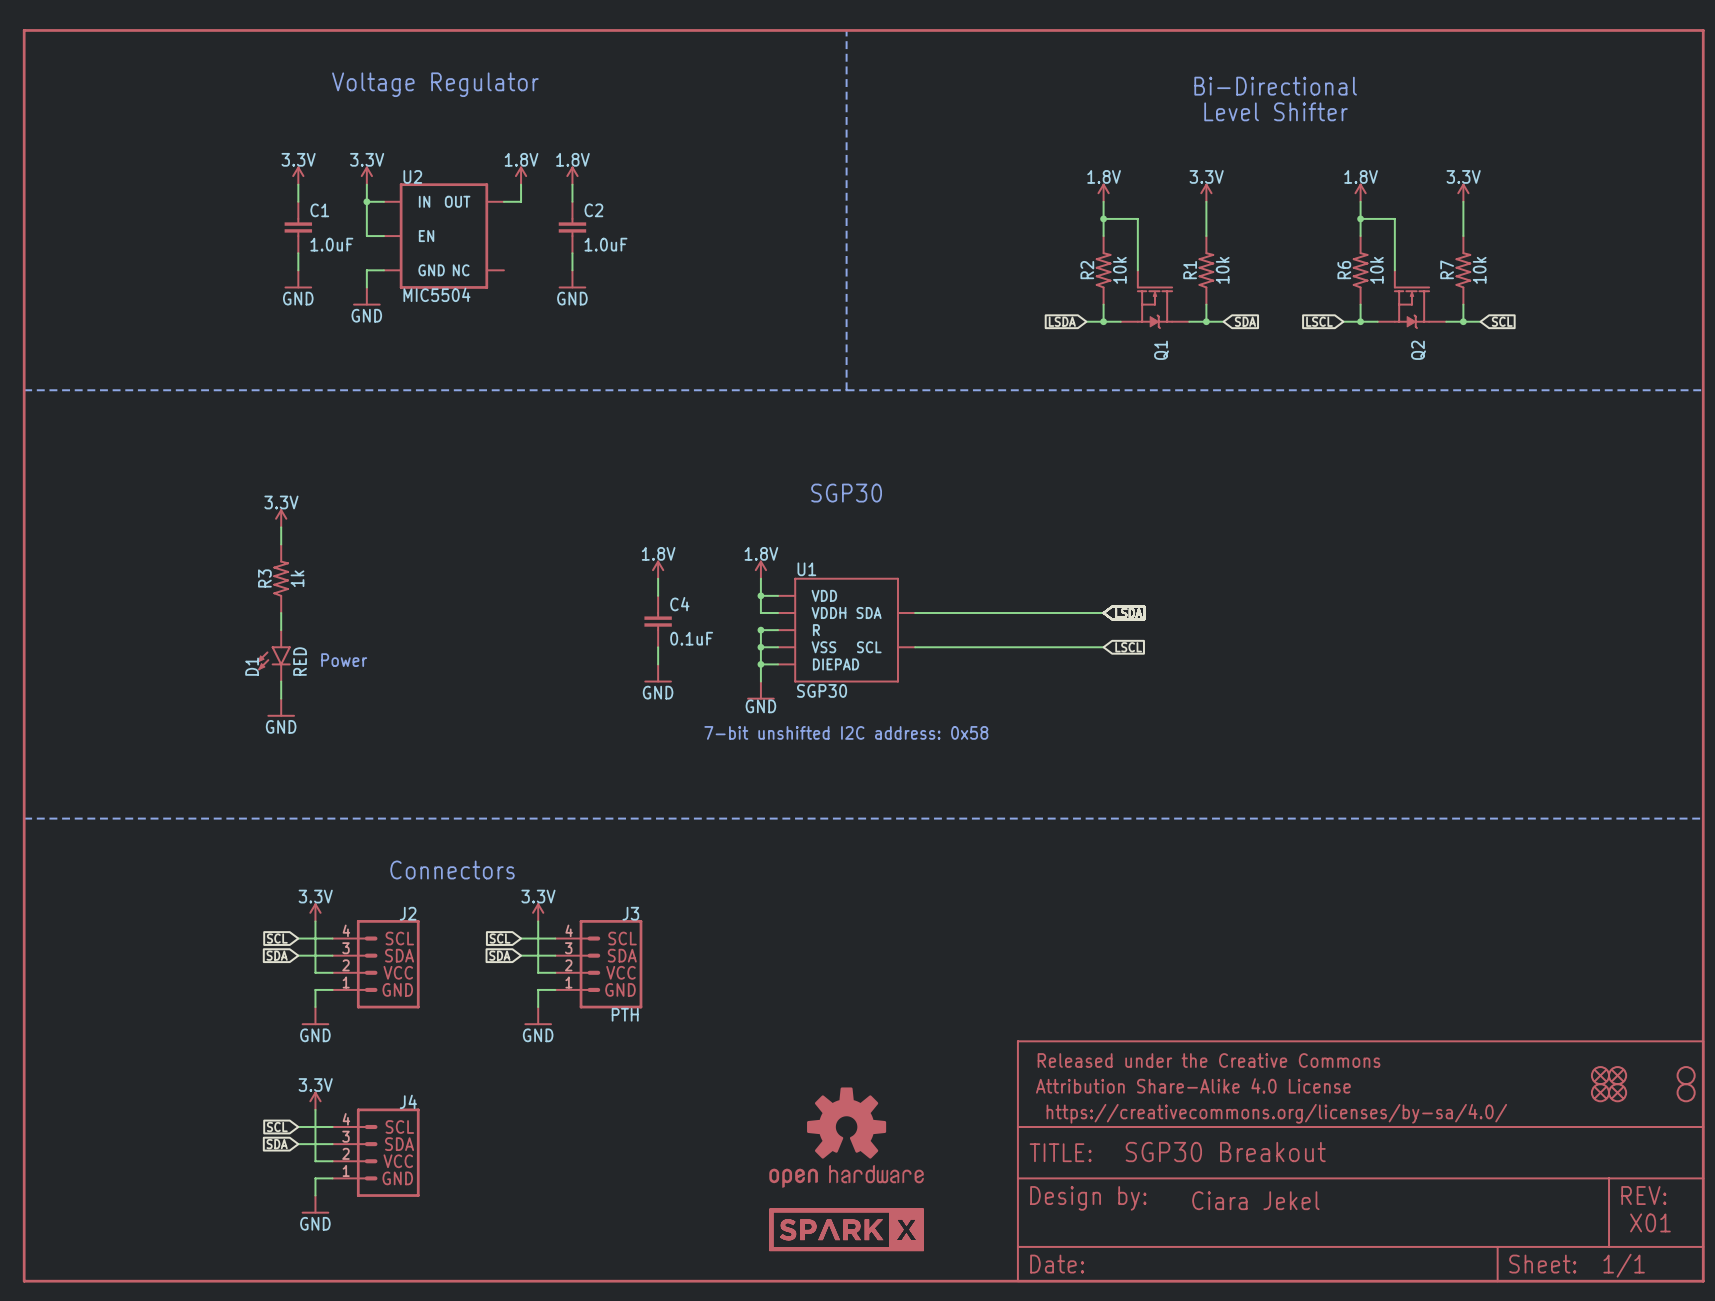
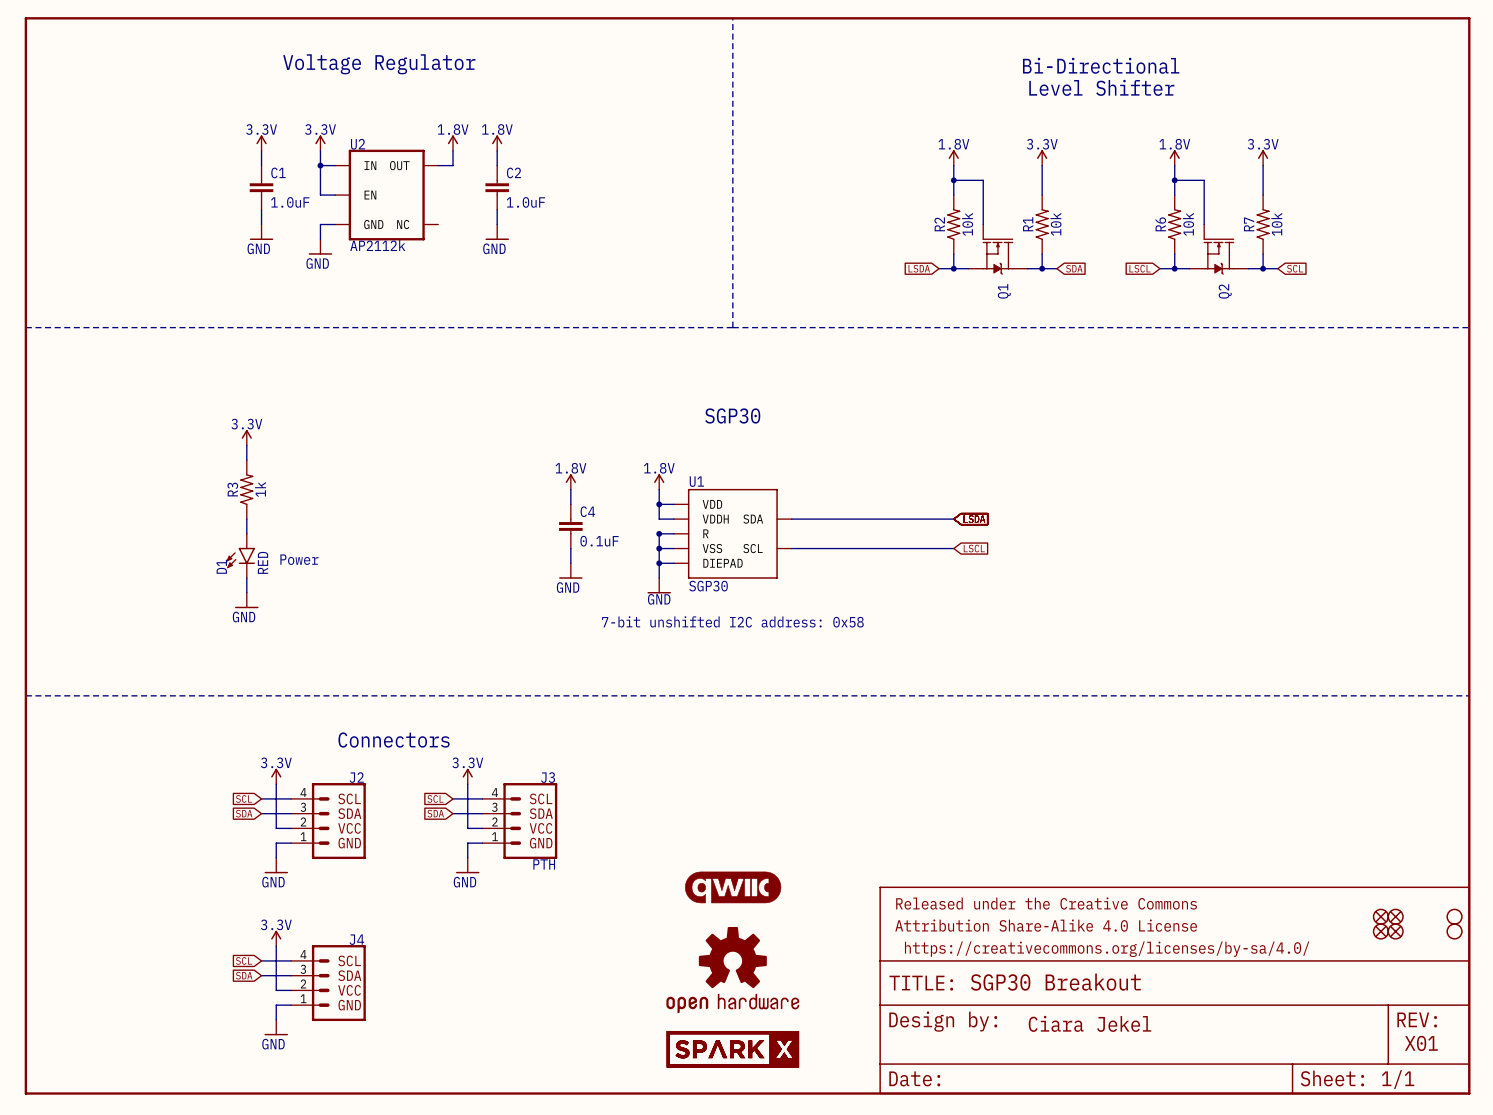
U2 value: MIC5504 (436, 294) -> AP2112k (377, 245)
part: none -> (733, 887)

